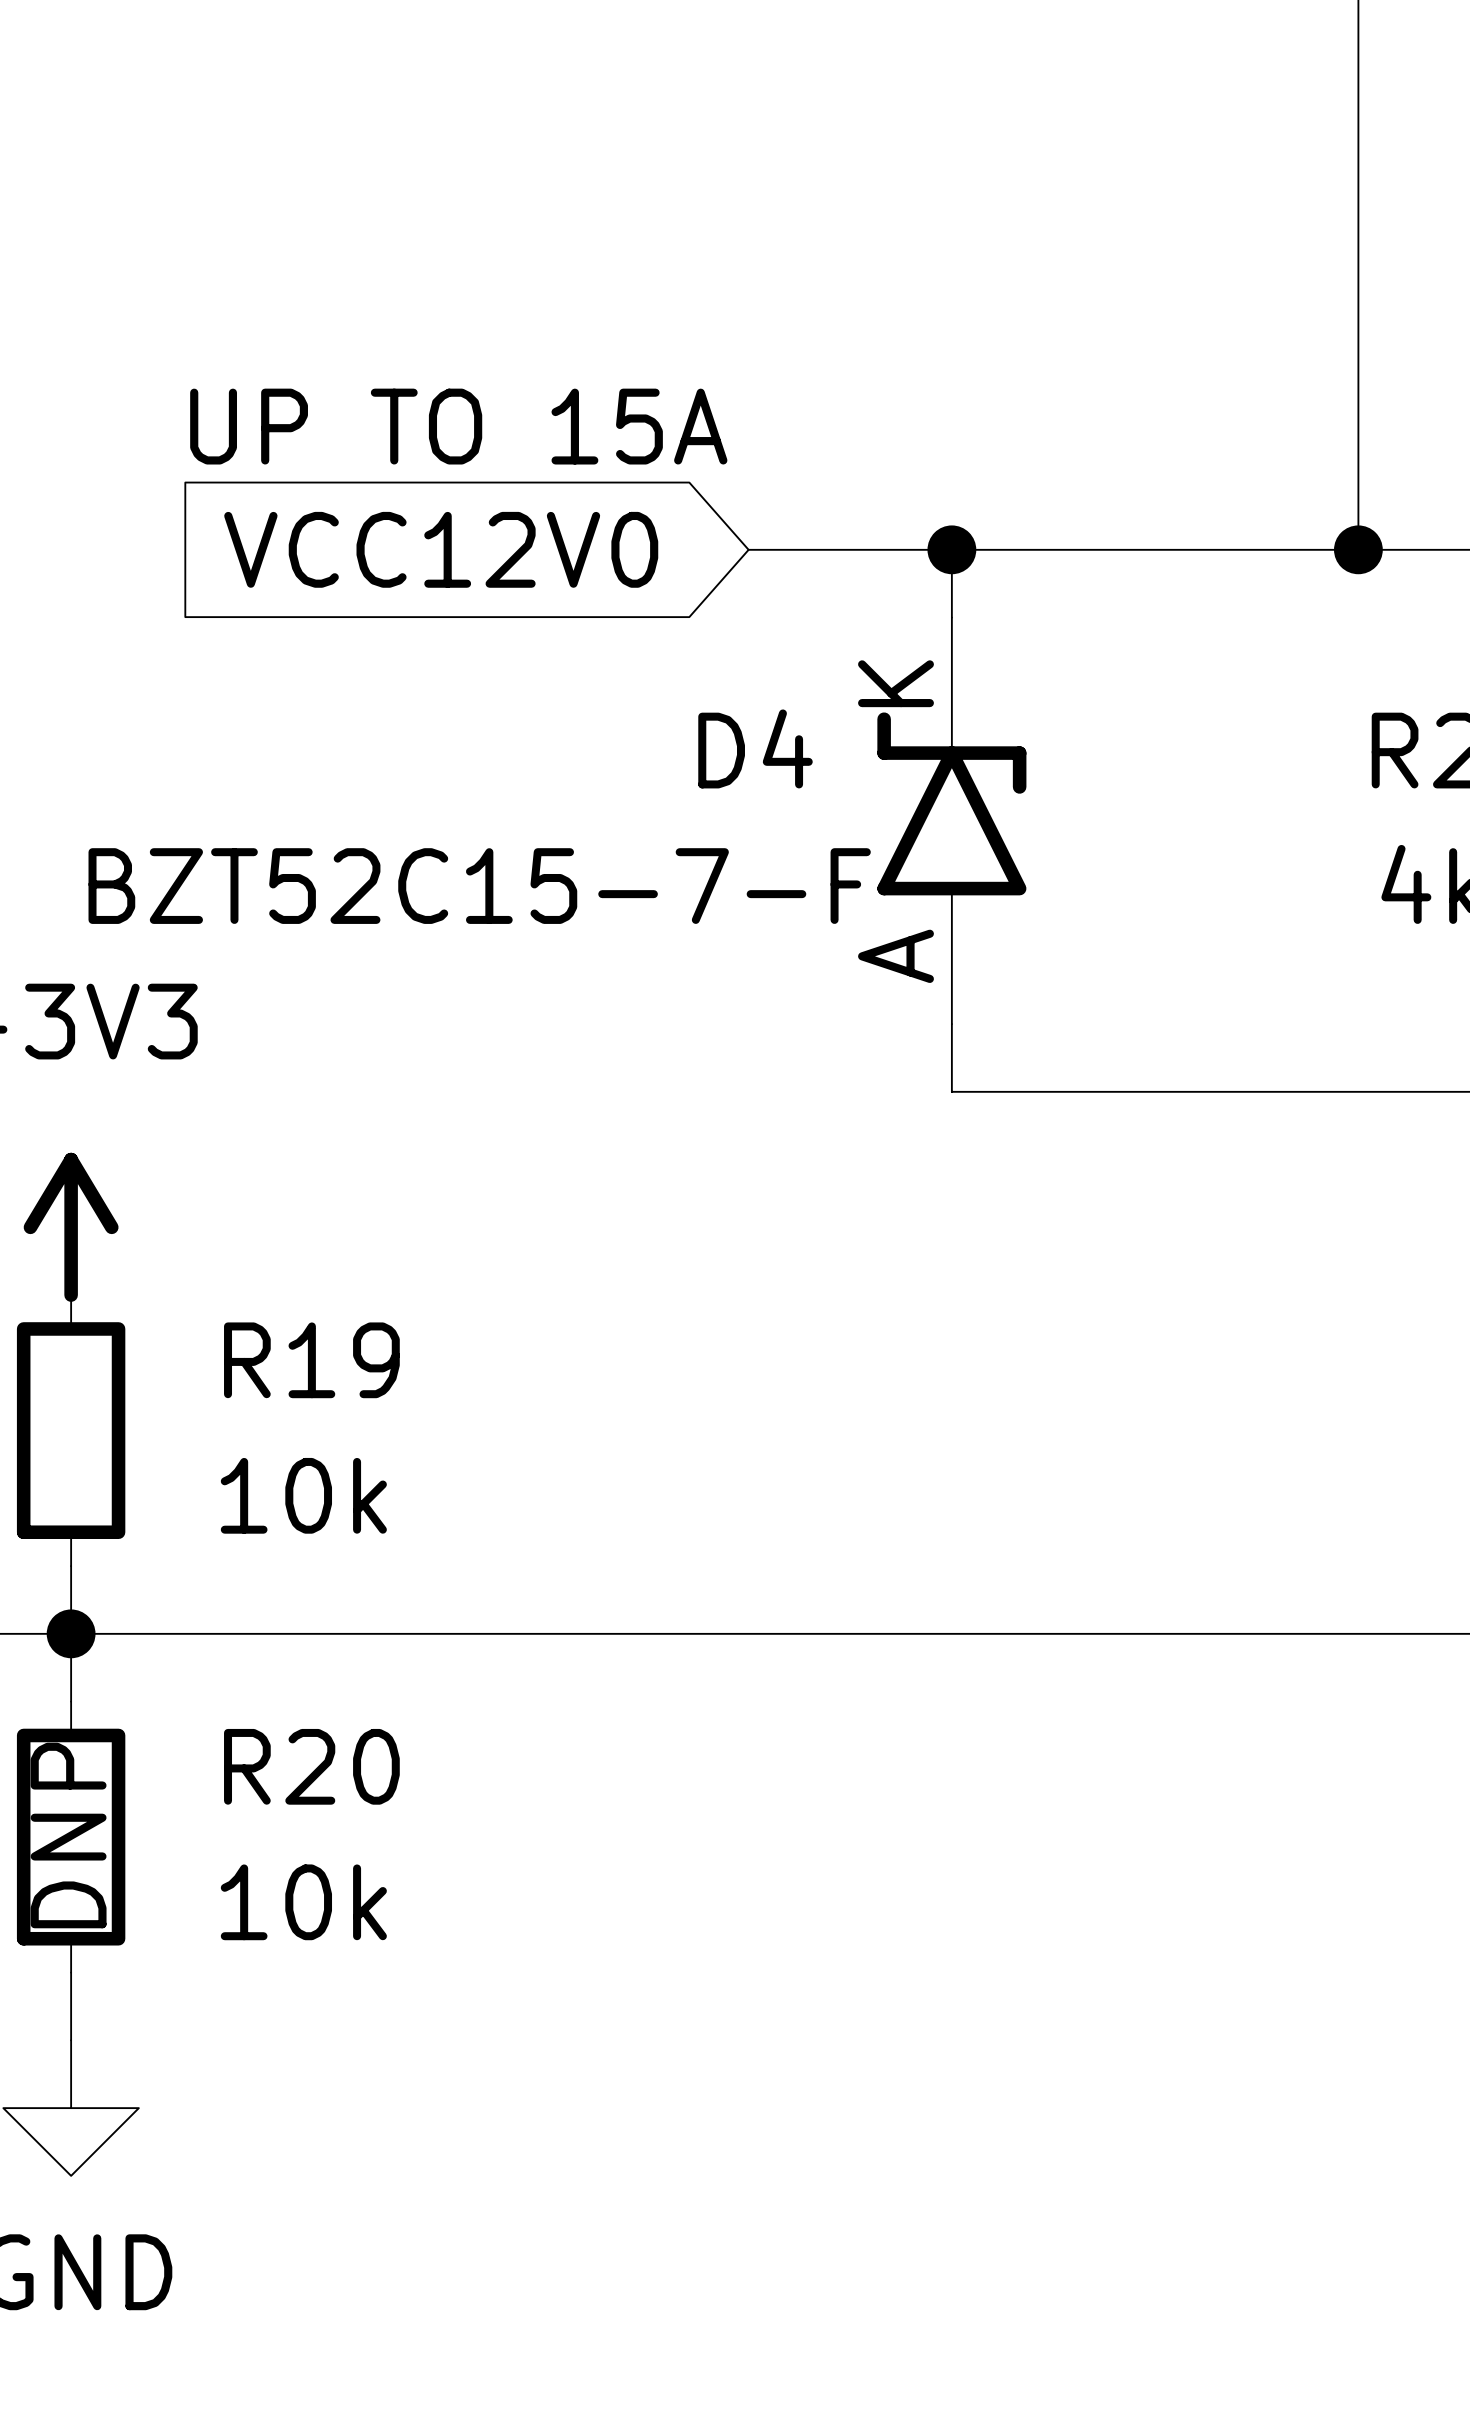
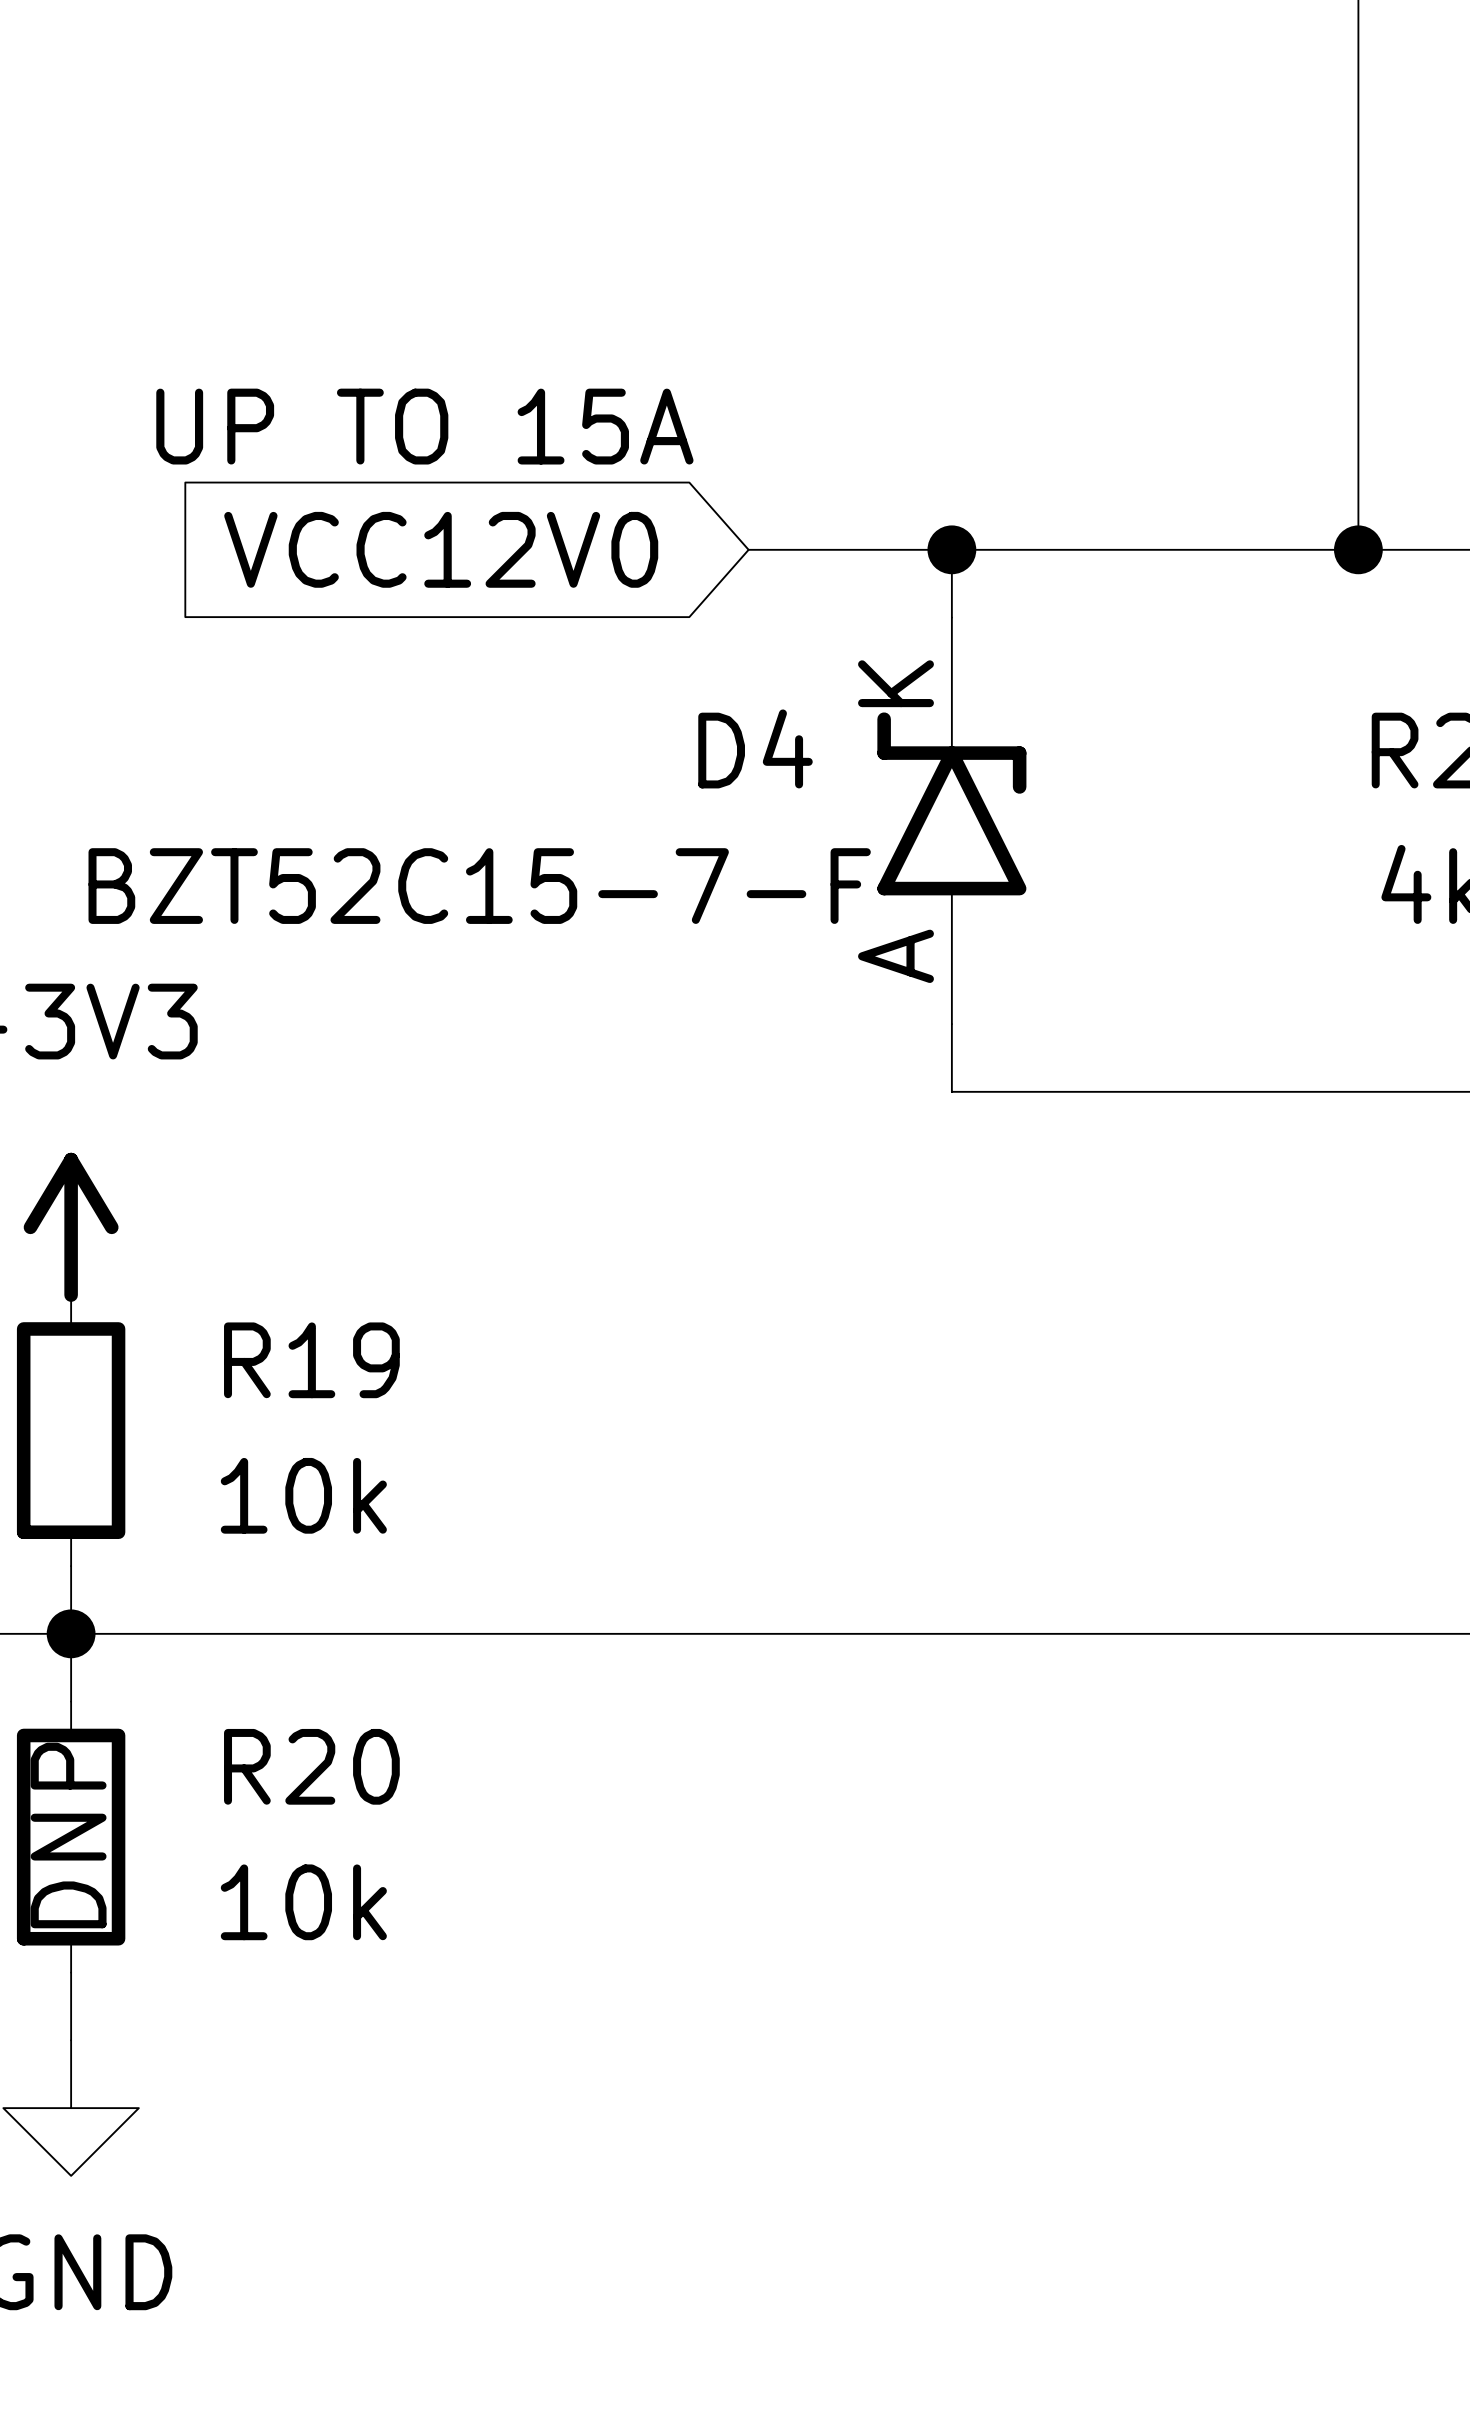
text position: UP TO 15A (458, 426) -> UP TO 15A (424, 426)

